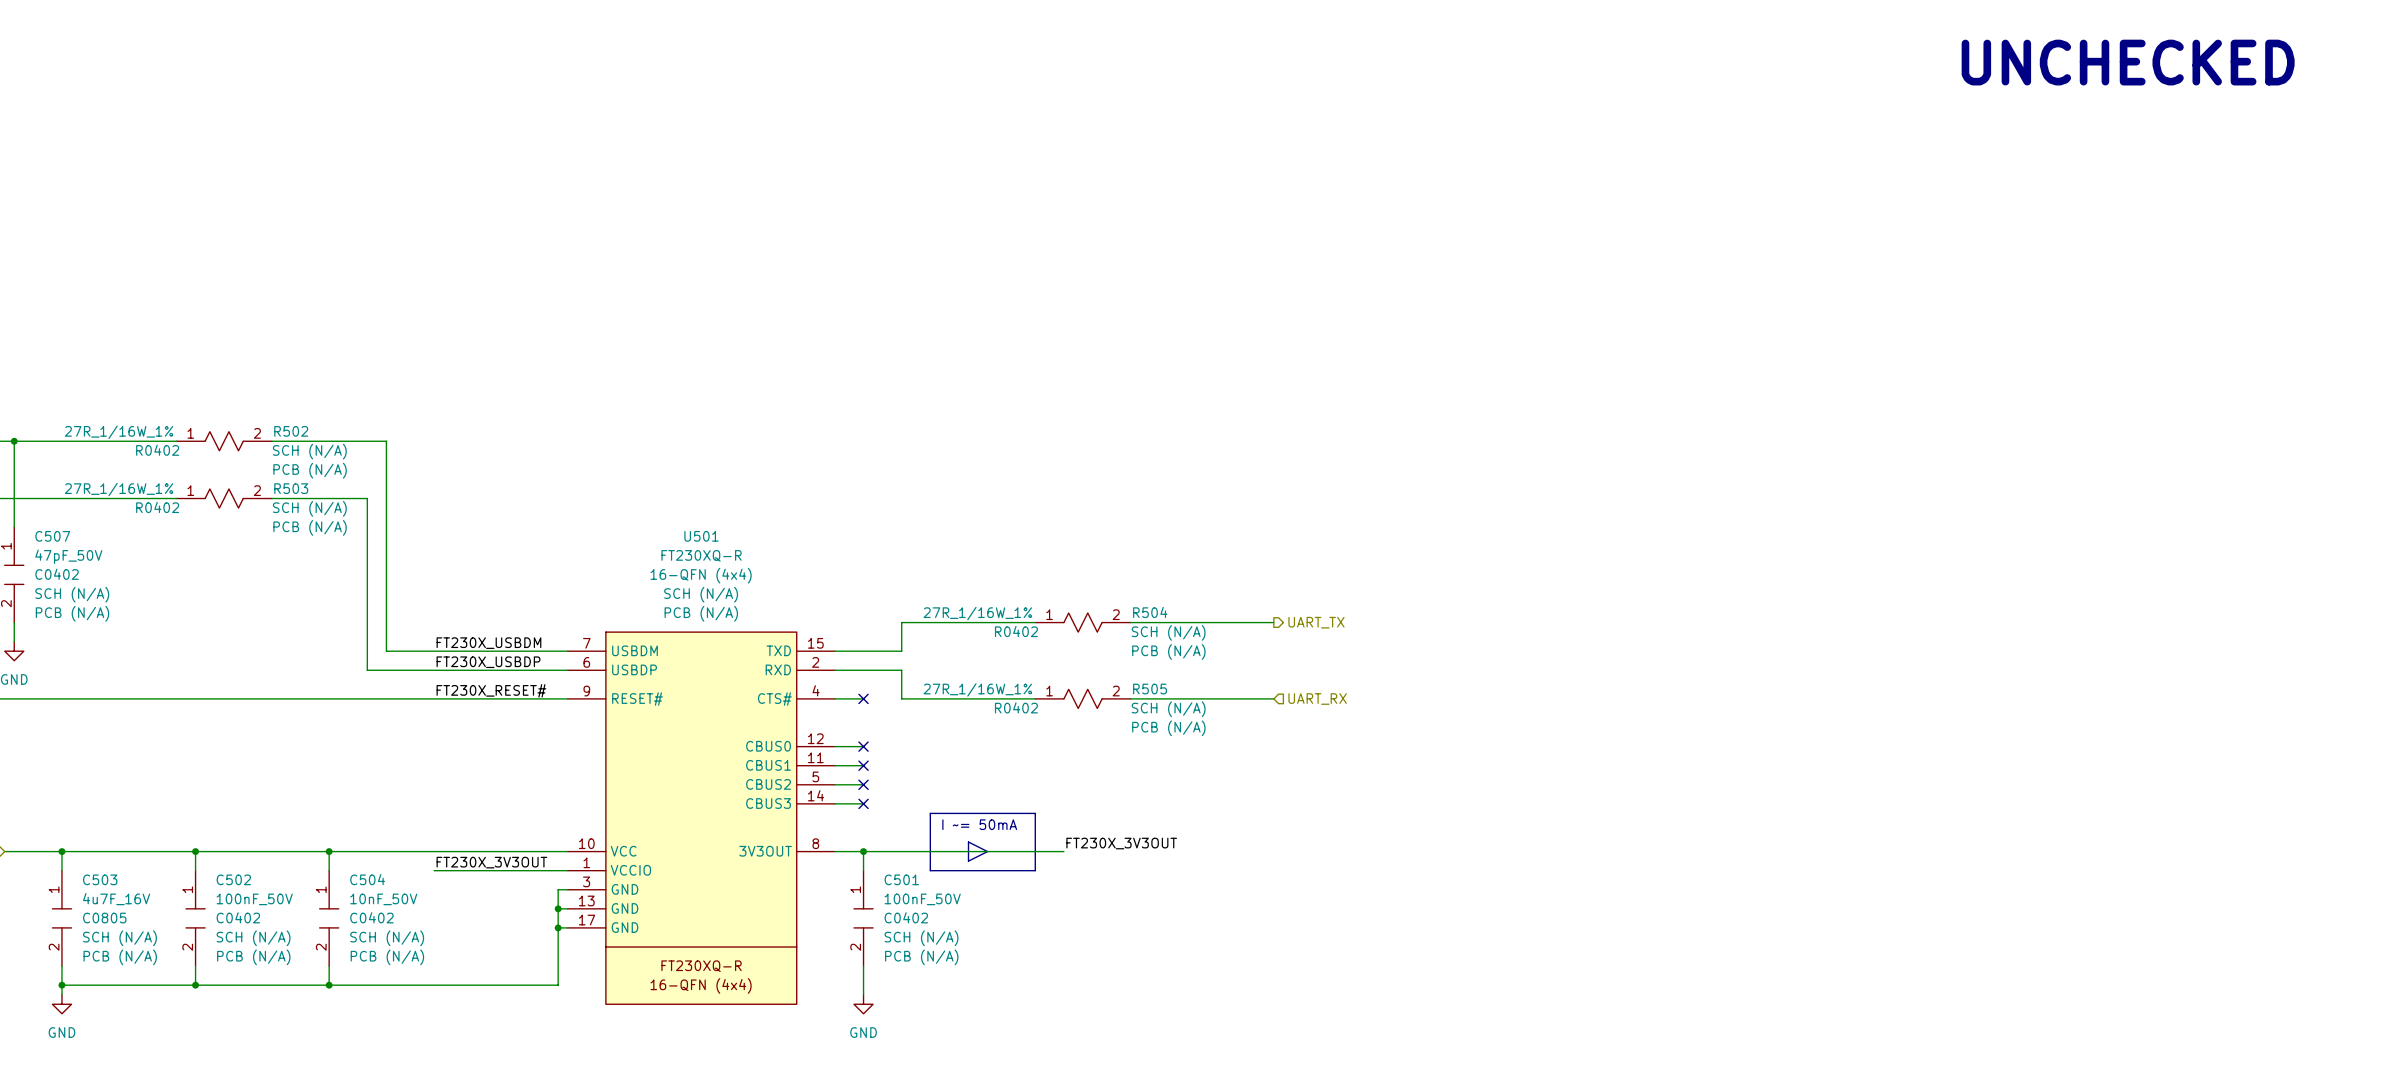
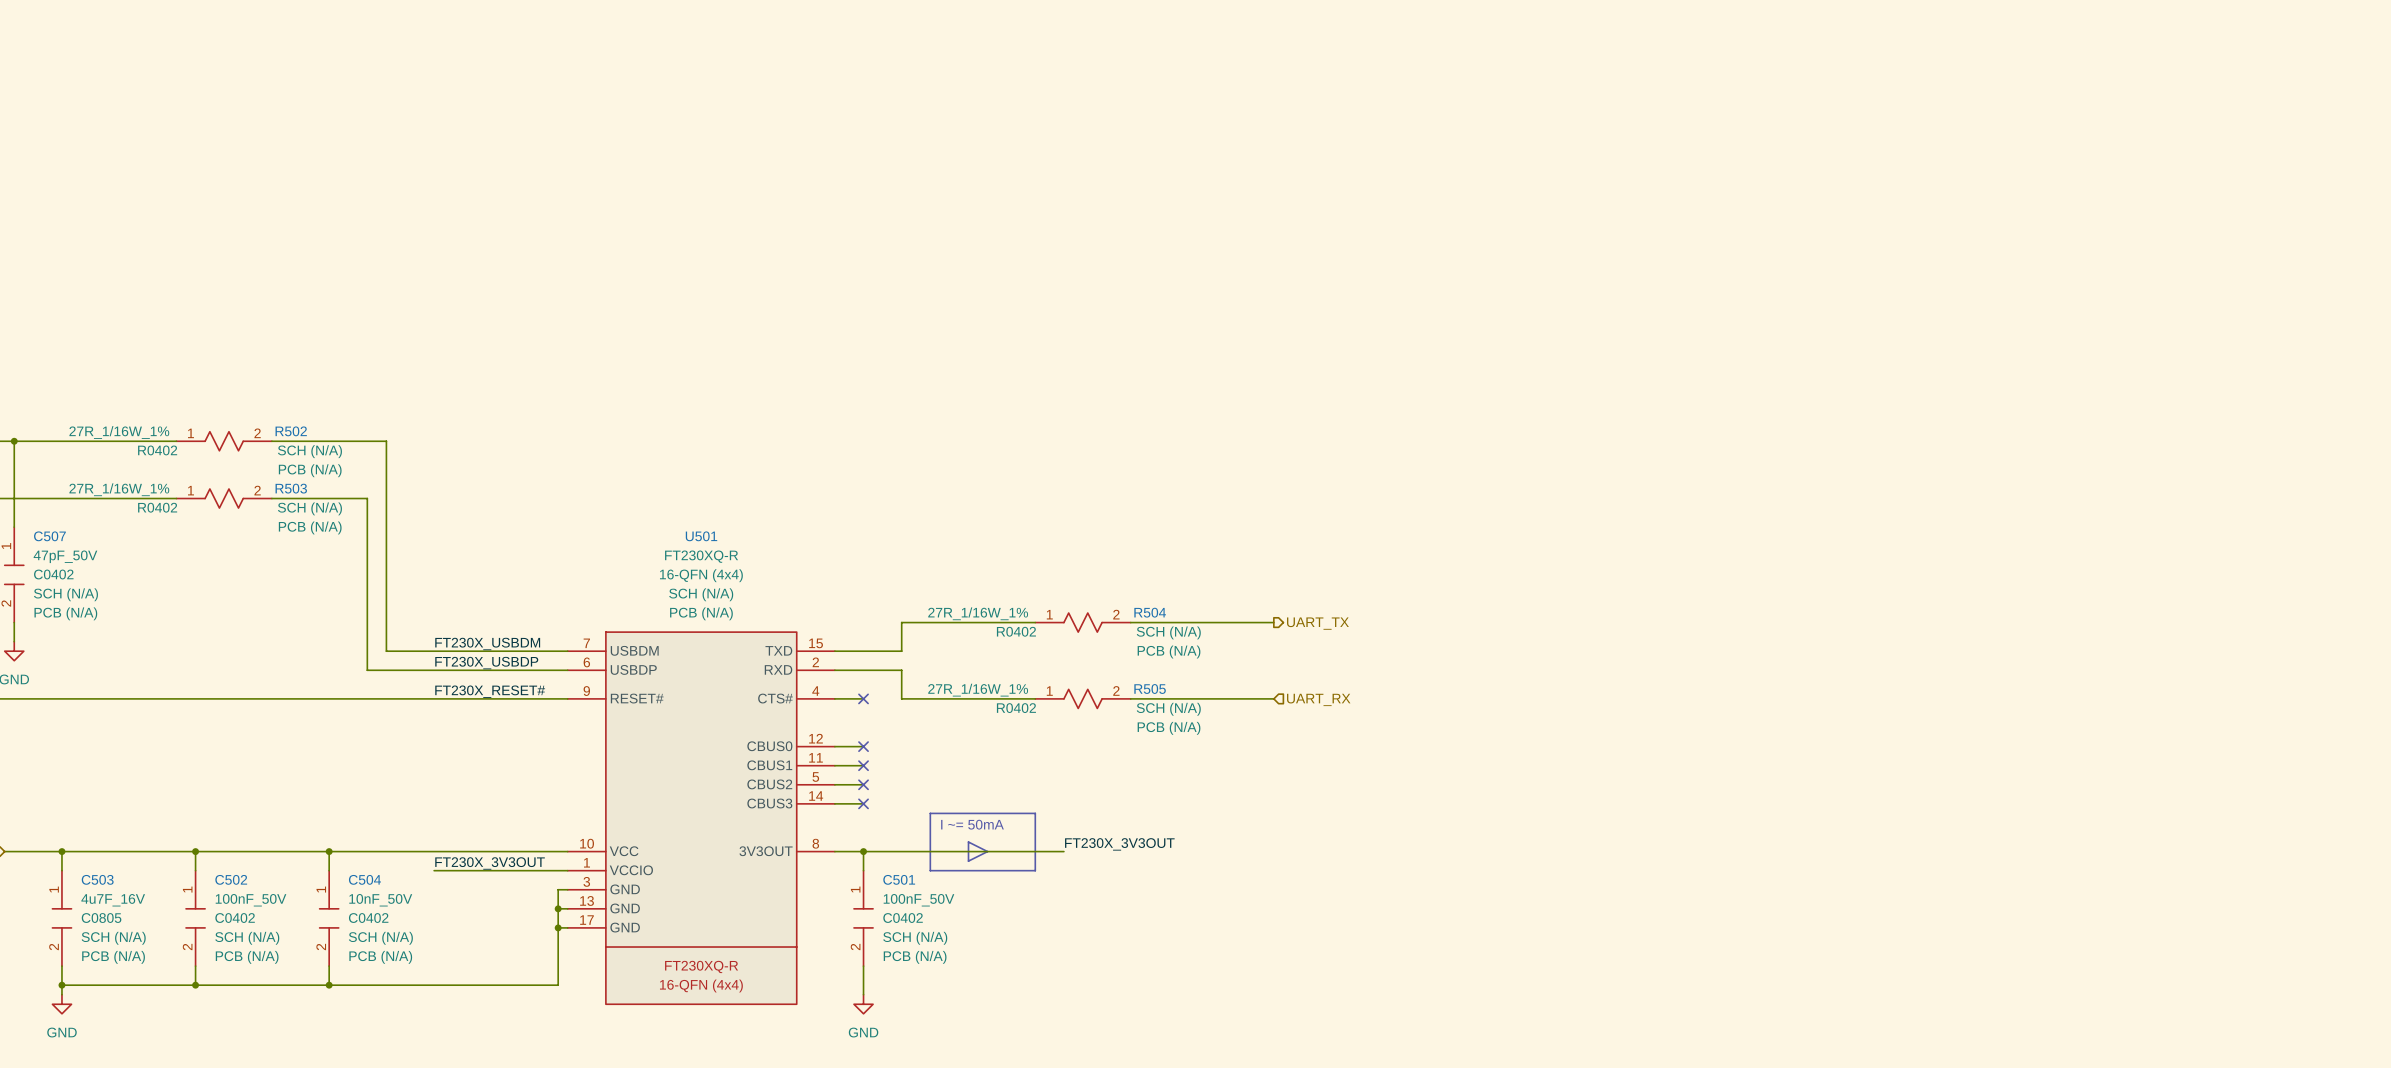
text: UNCHECKED (2128, 62) -> none

